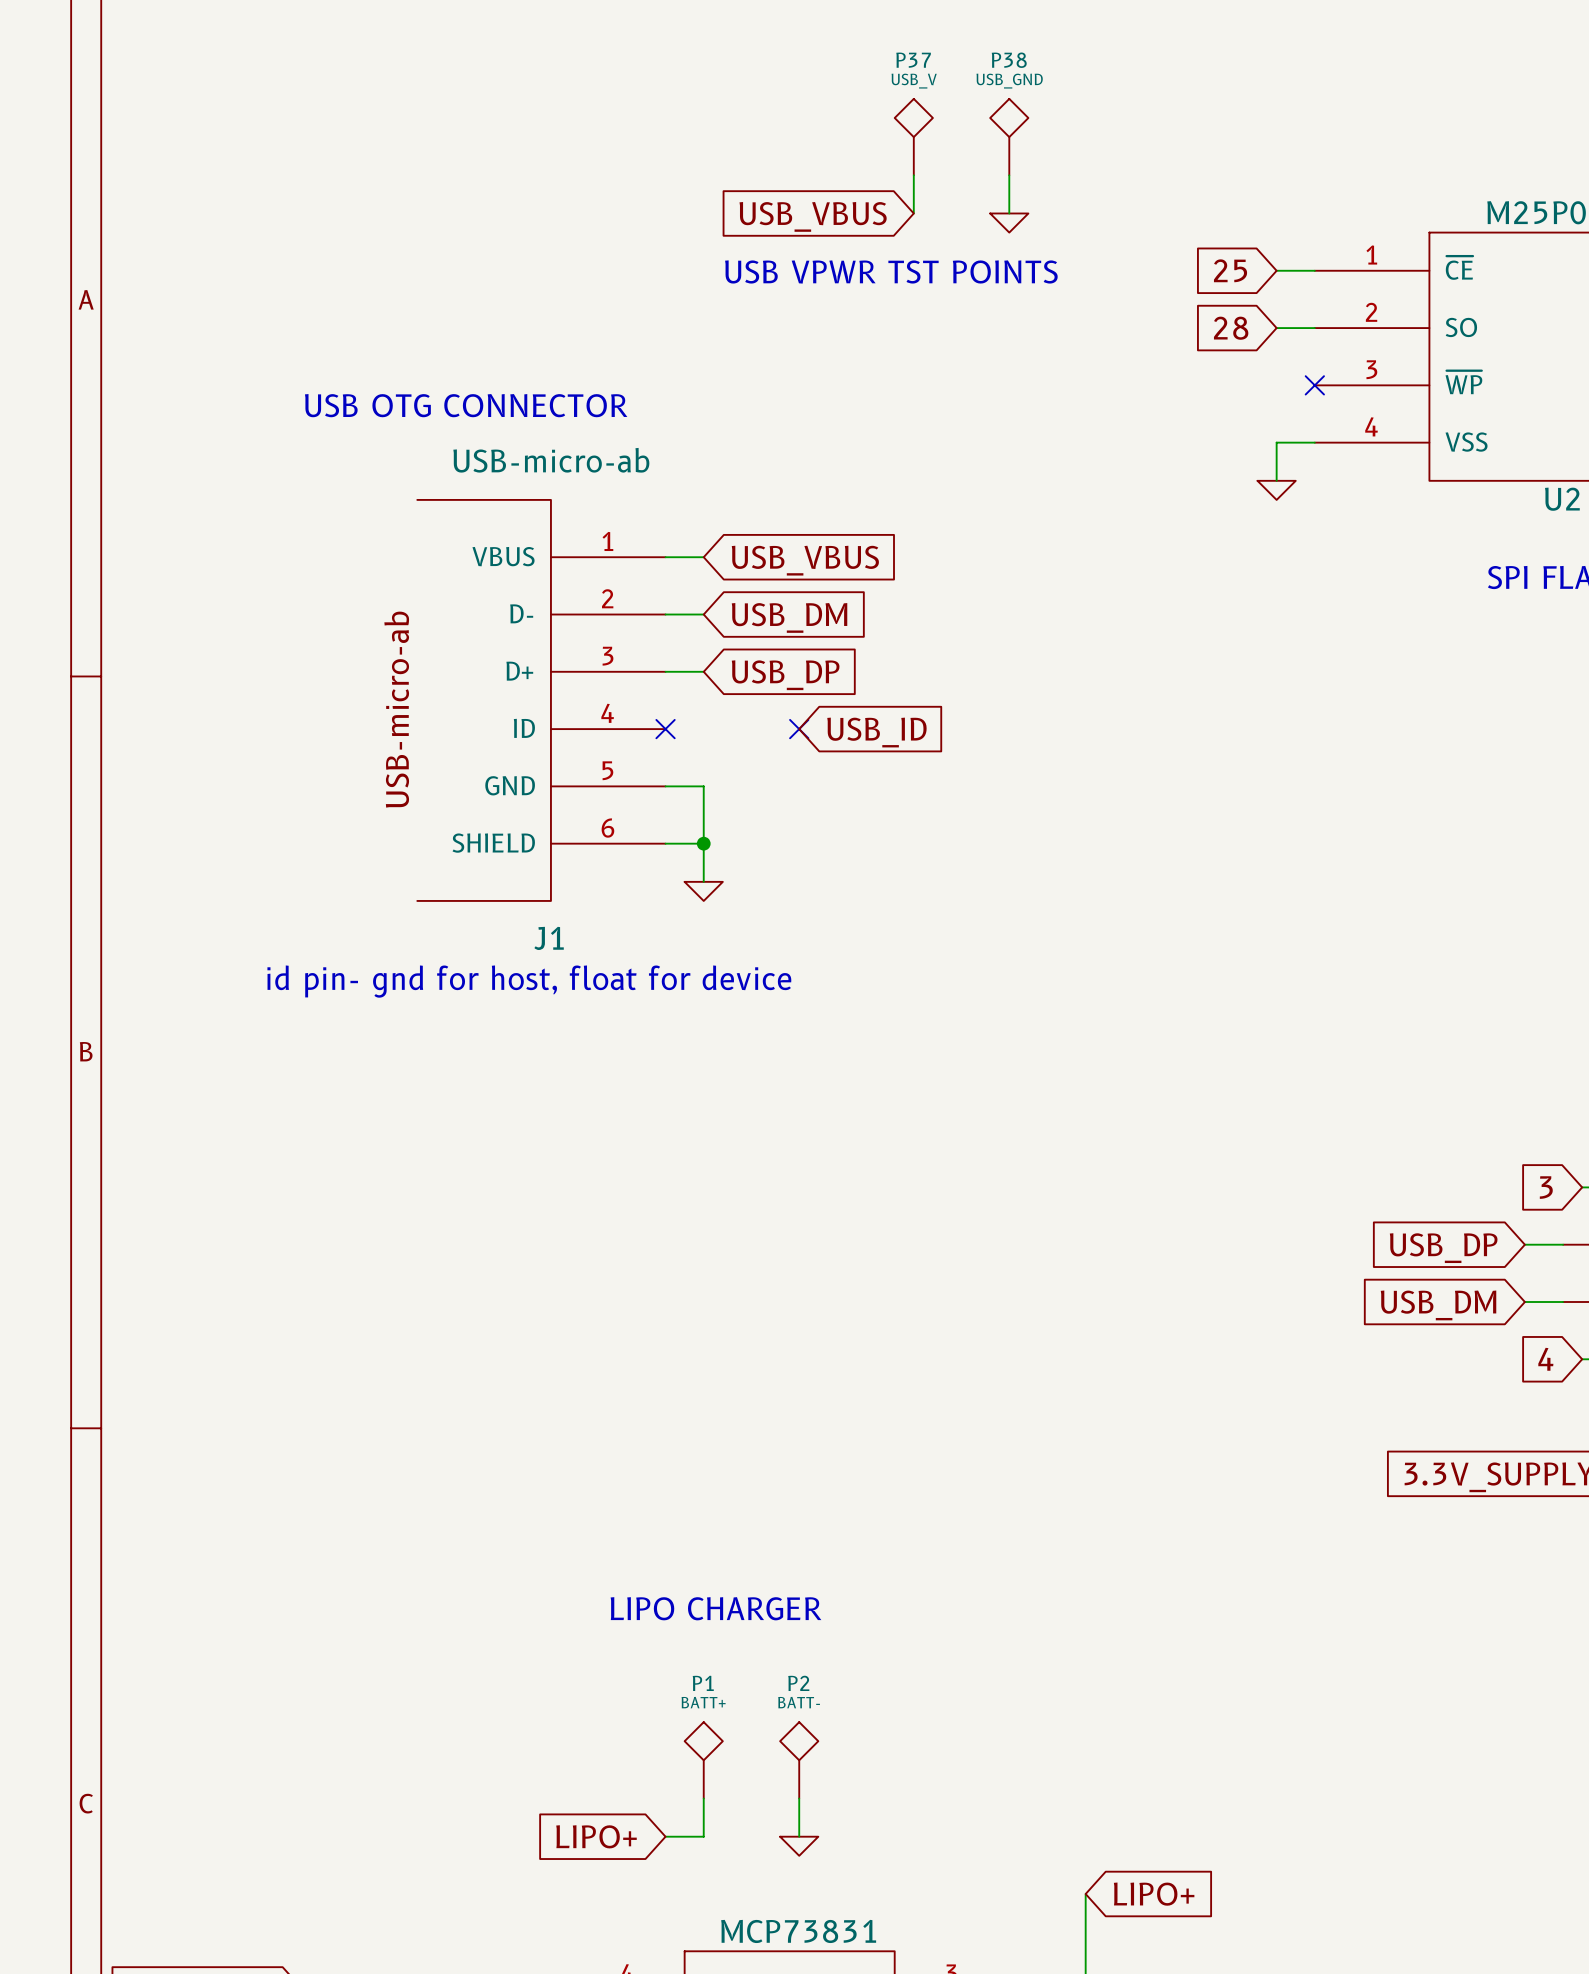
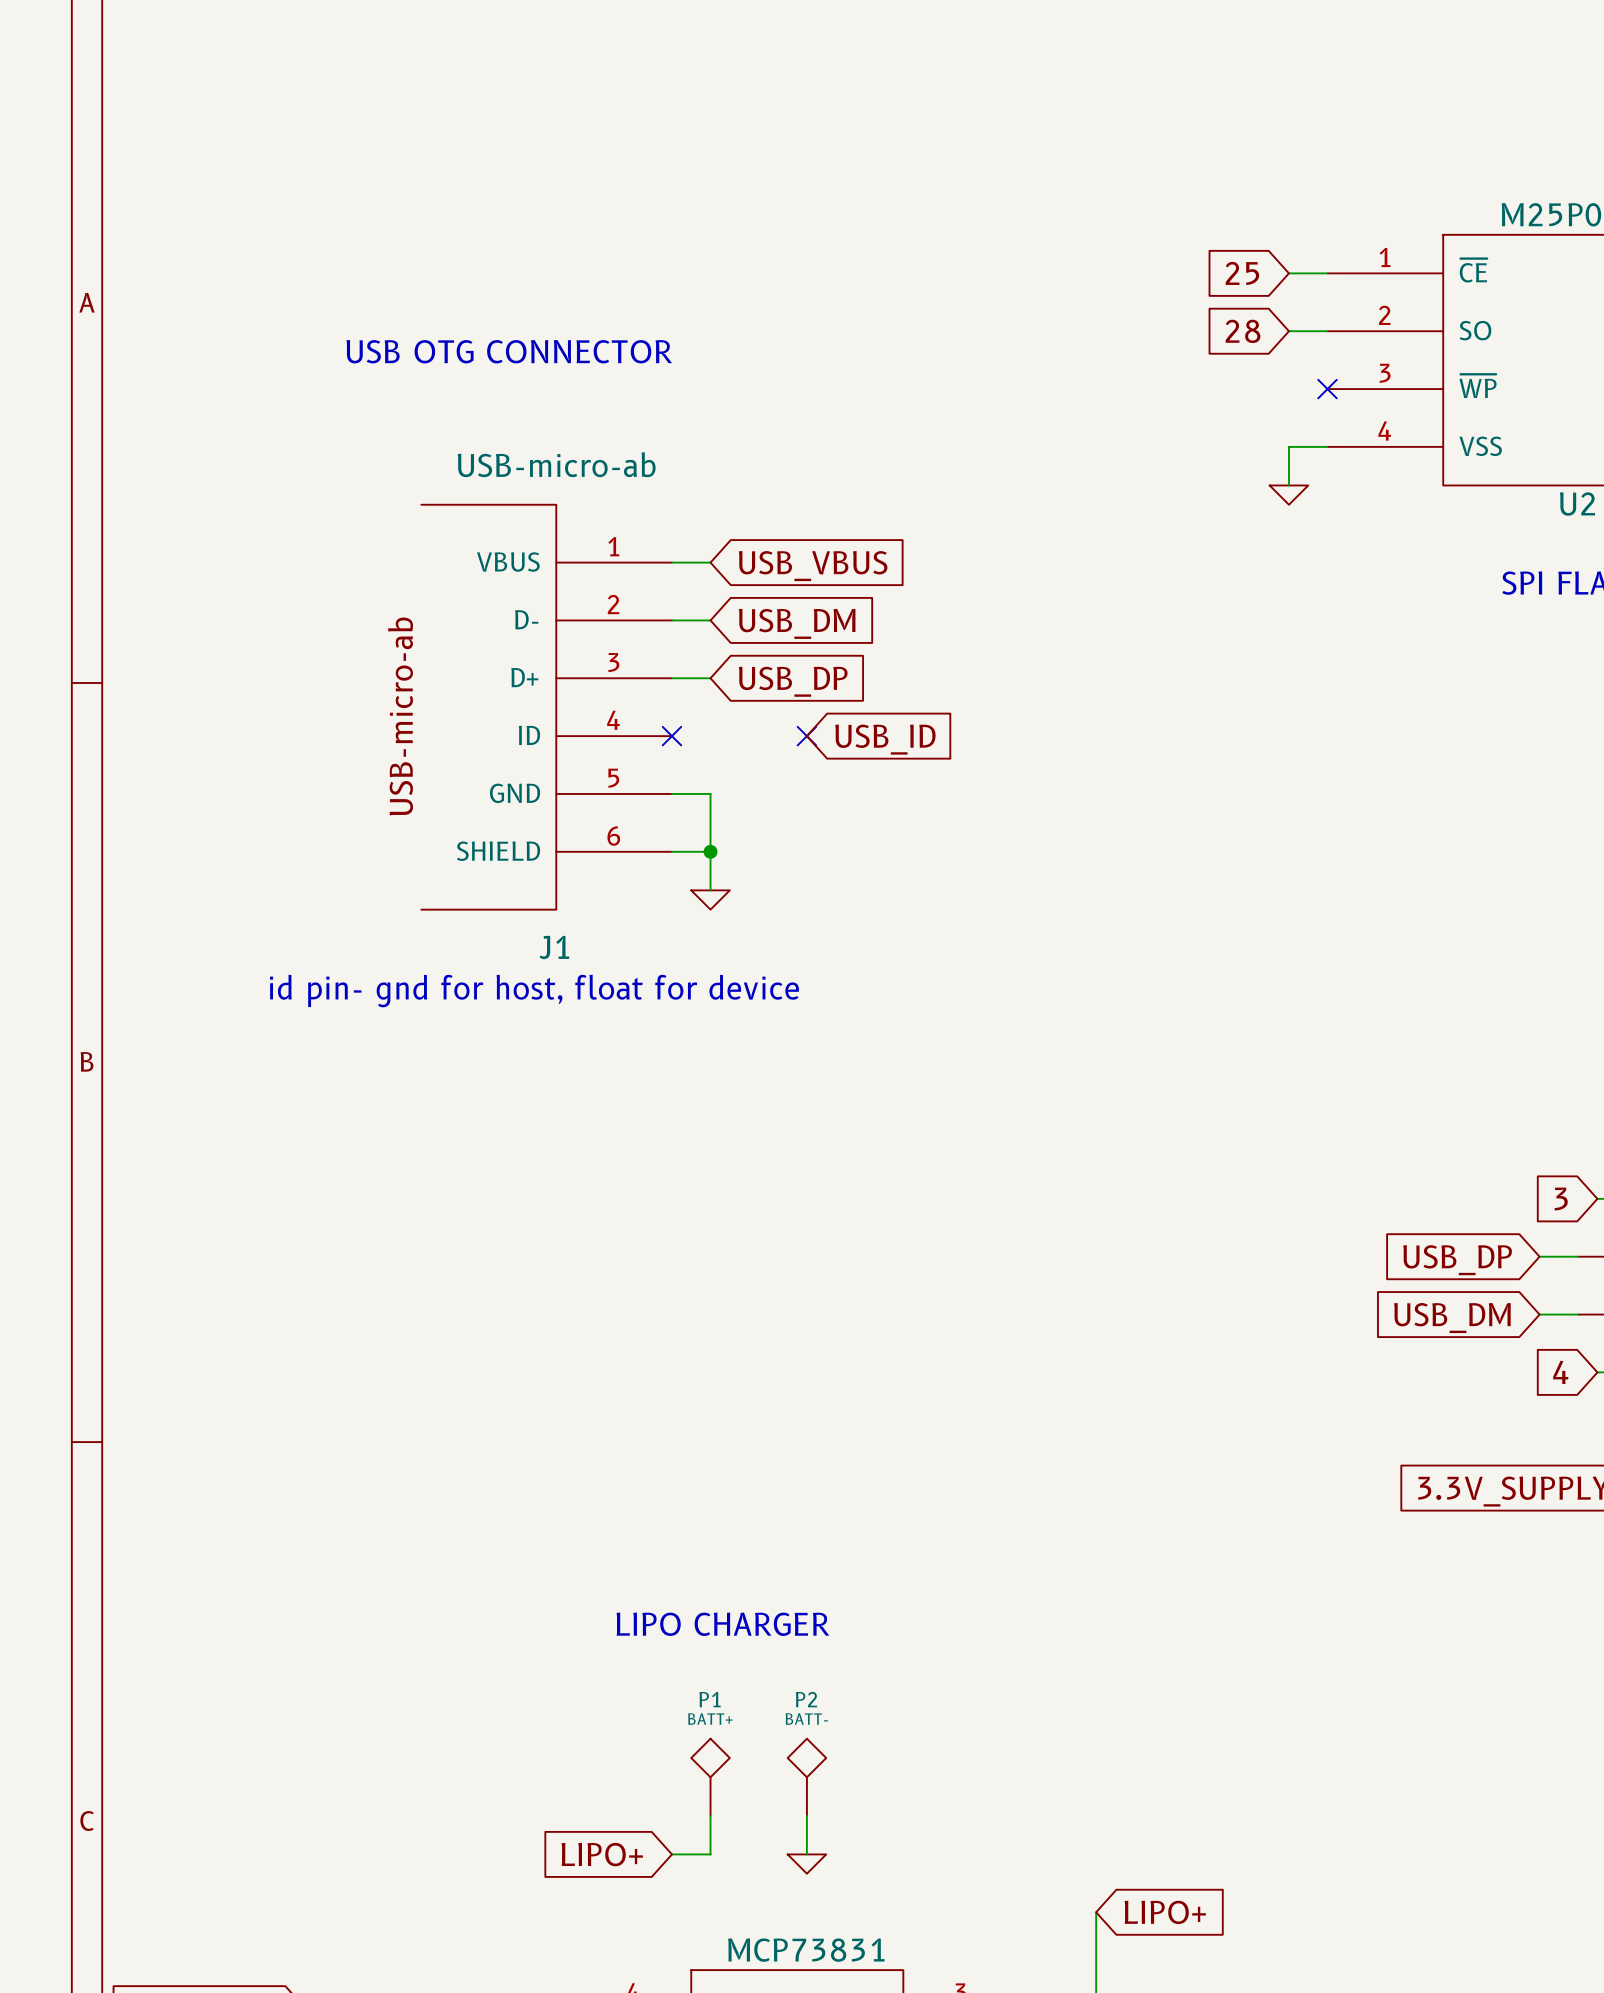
P37: USB_V (913, 137) -> none
P38: USB_GND (1009, 137) -> none
wire: (913, 175) (913, 213) -> none
wire: (1009, 175) (1009, 213) -> none
global label: USB_VBUS (813, 216) -> none
power symbol: (1009, 223) -> none
text: USB VPWR TST POINTS (891, 271) -> none
text position: USB OTG CONNECTOR (466, 405) -> USB OTG CONNECTOR (509, 351)

